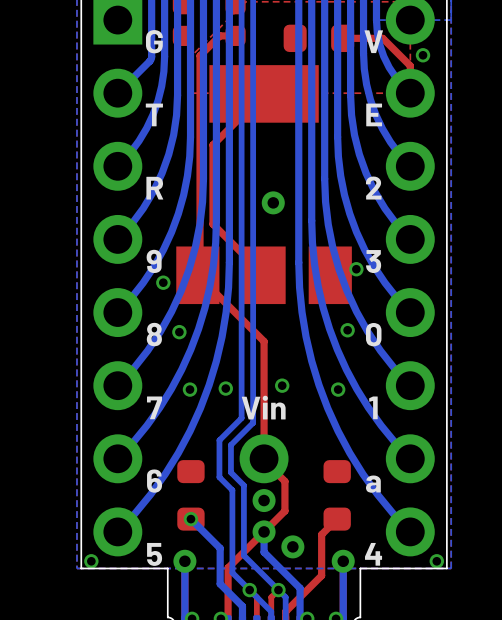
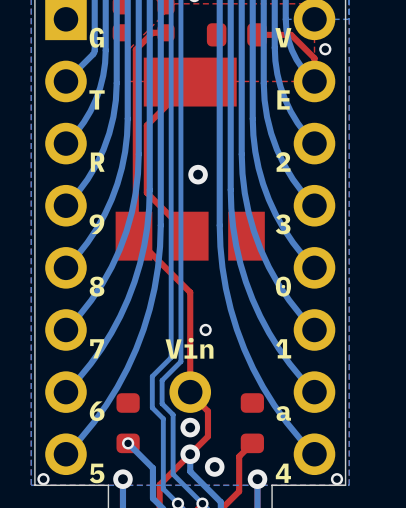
via: (356, 269) -> none
via: (163, 282) -> none
via: (347, 330) -> none
via: (179, 332) -> none
via: (225, 388) -> none
via: (189, 389) -> none
via: (338, 389) -> none

